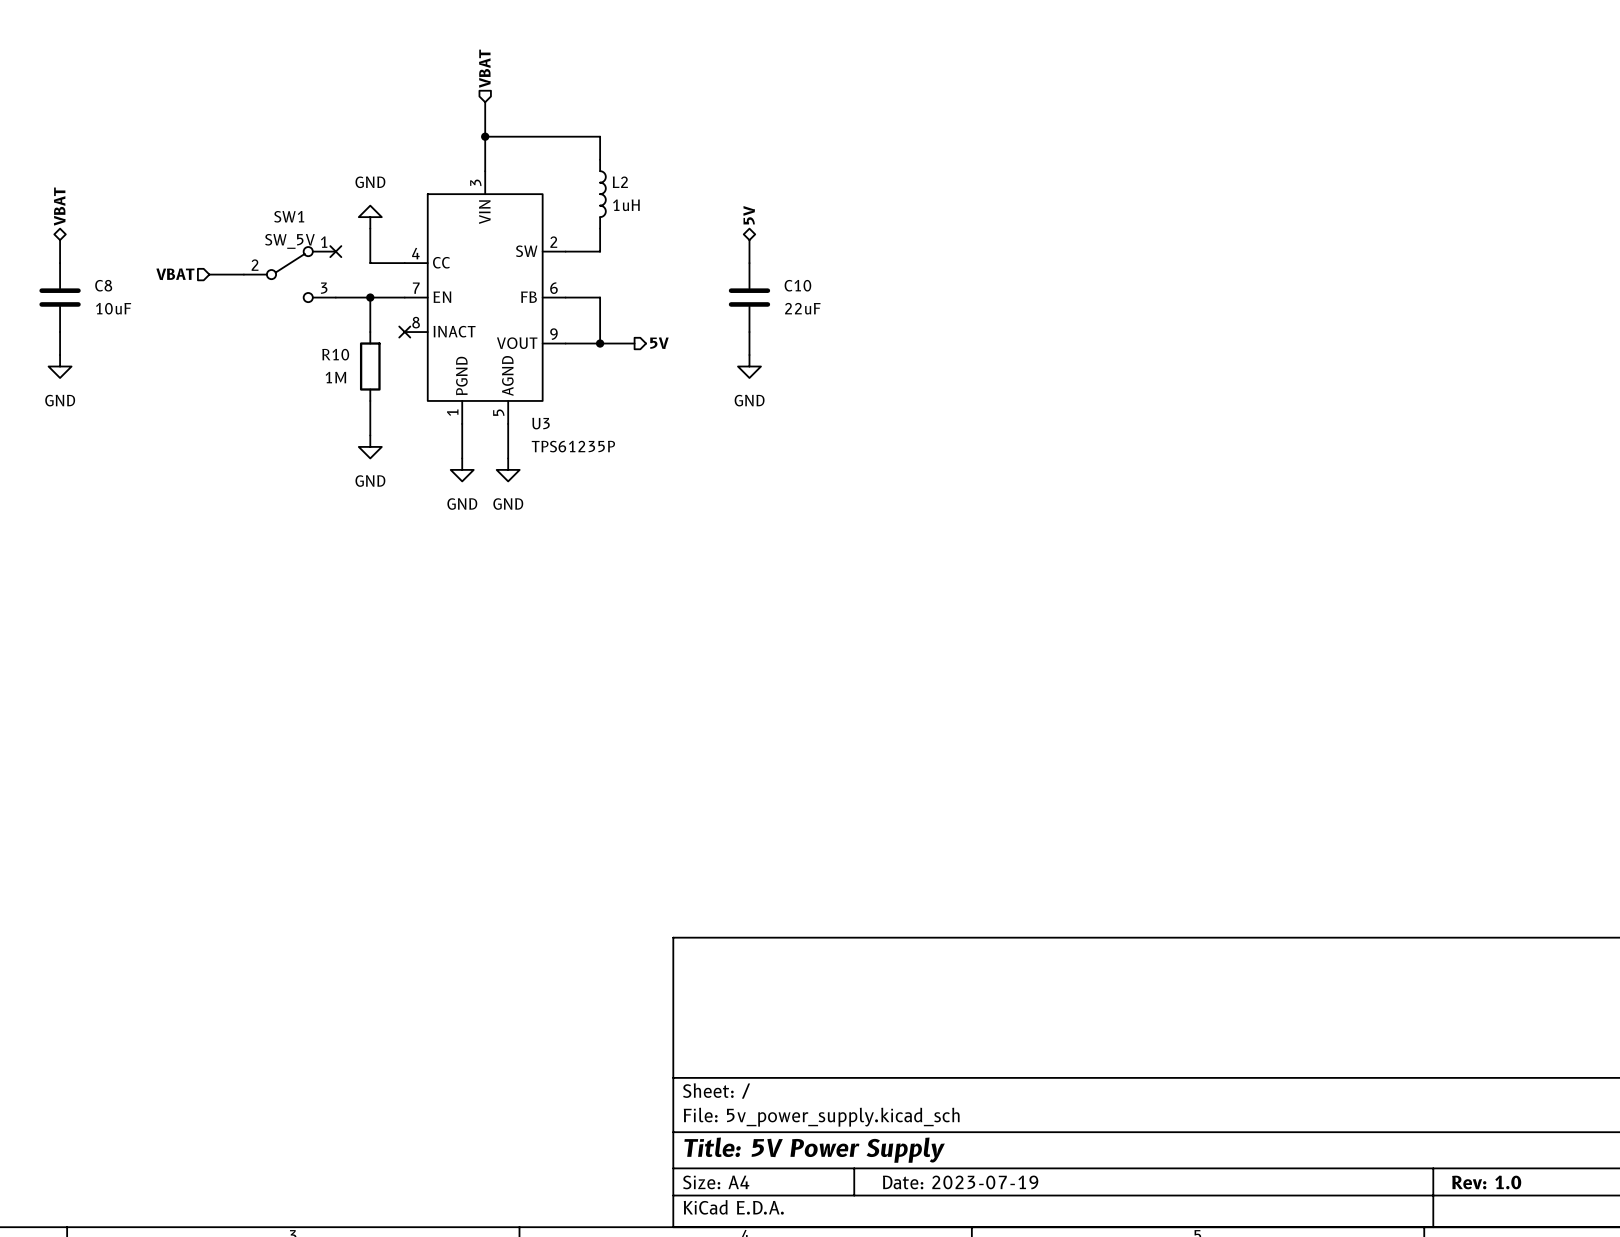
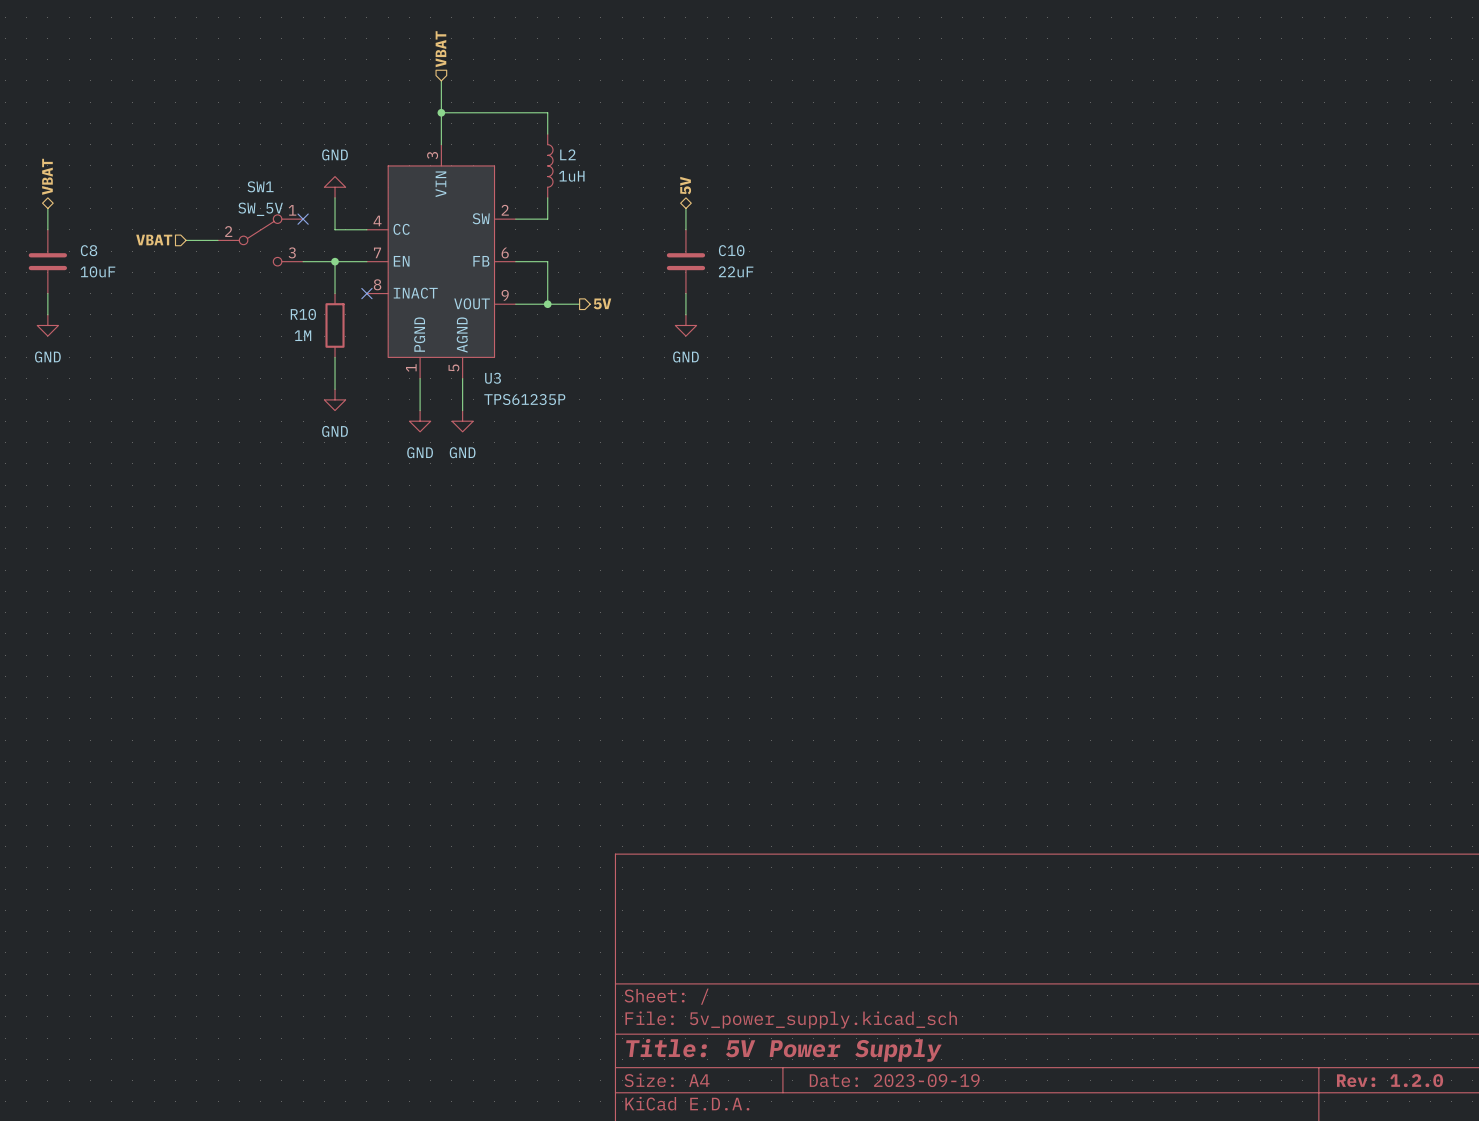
title block: Date: 2023-07-19 (960, 1182) -> Date: 2023-09-19 (894, 1080)
title block: Rev: 1.0 (1486, 1182) -> Rev: 1.2.0 (1390, 1080)

